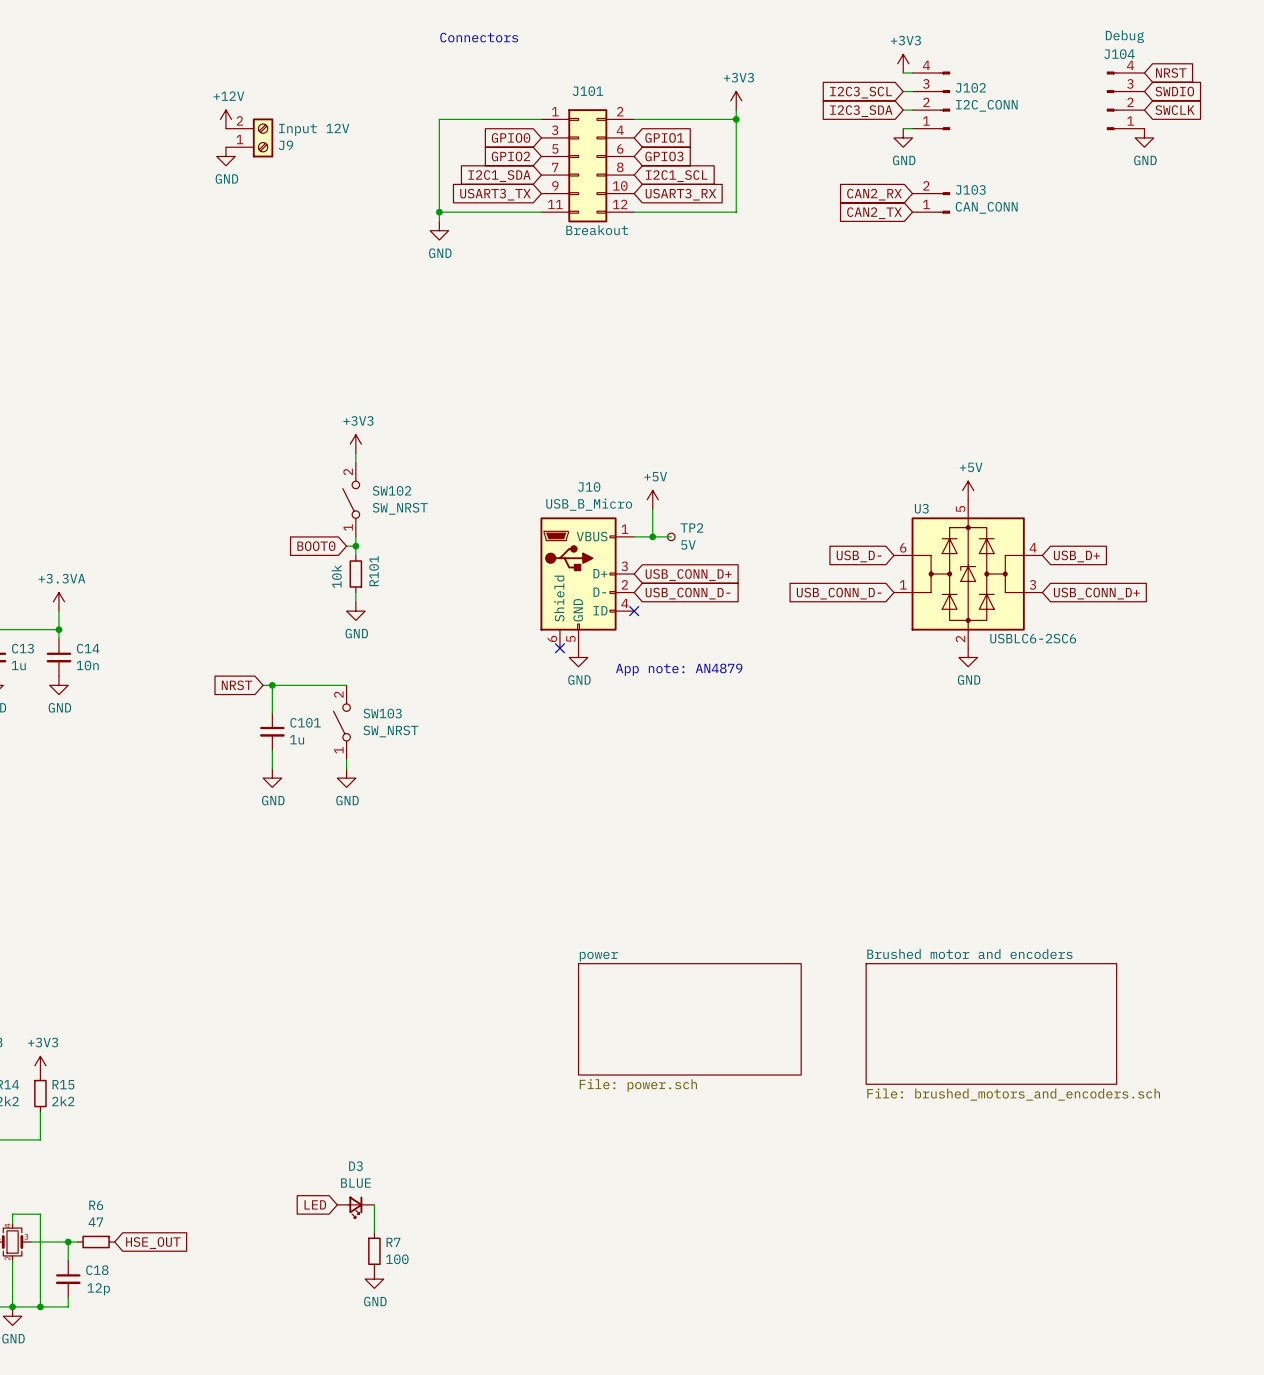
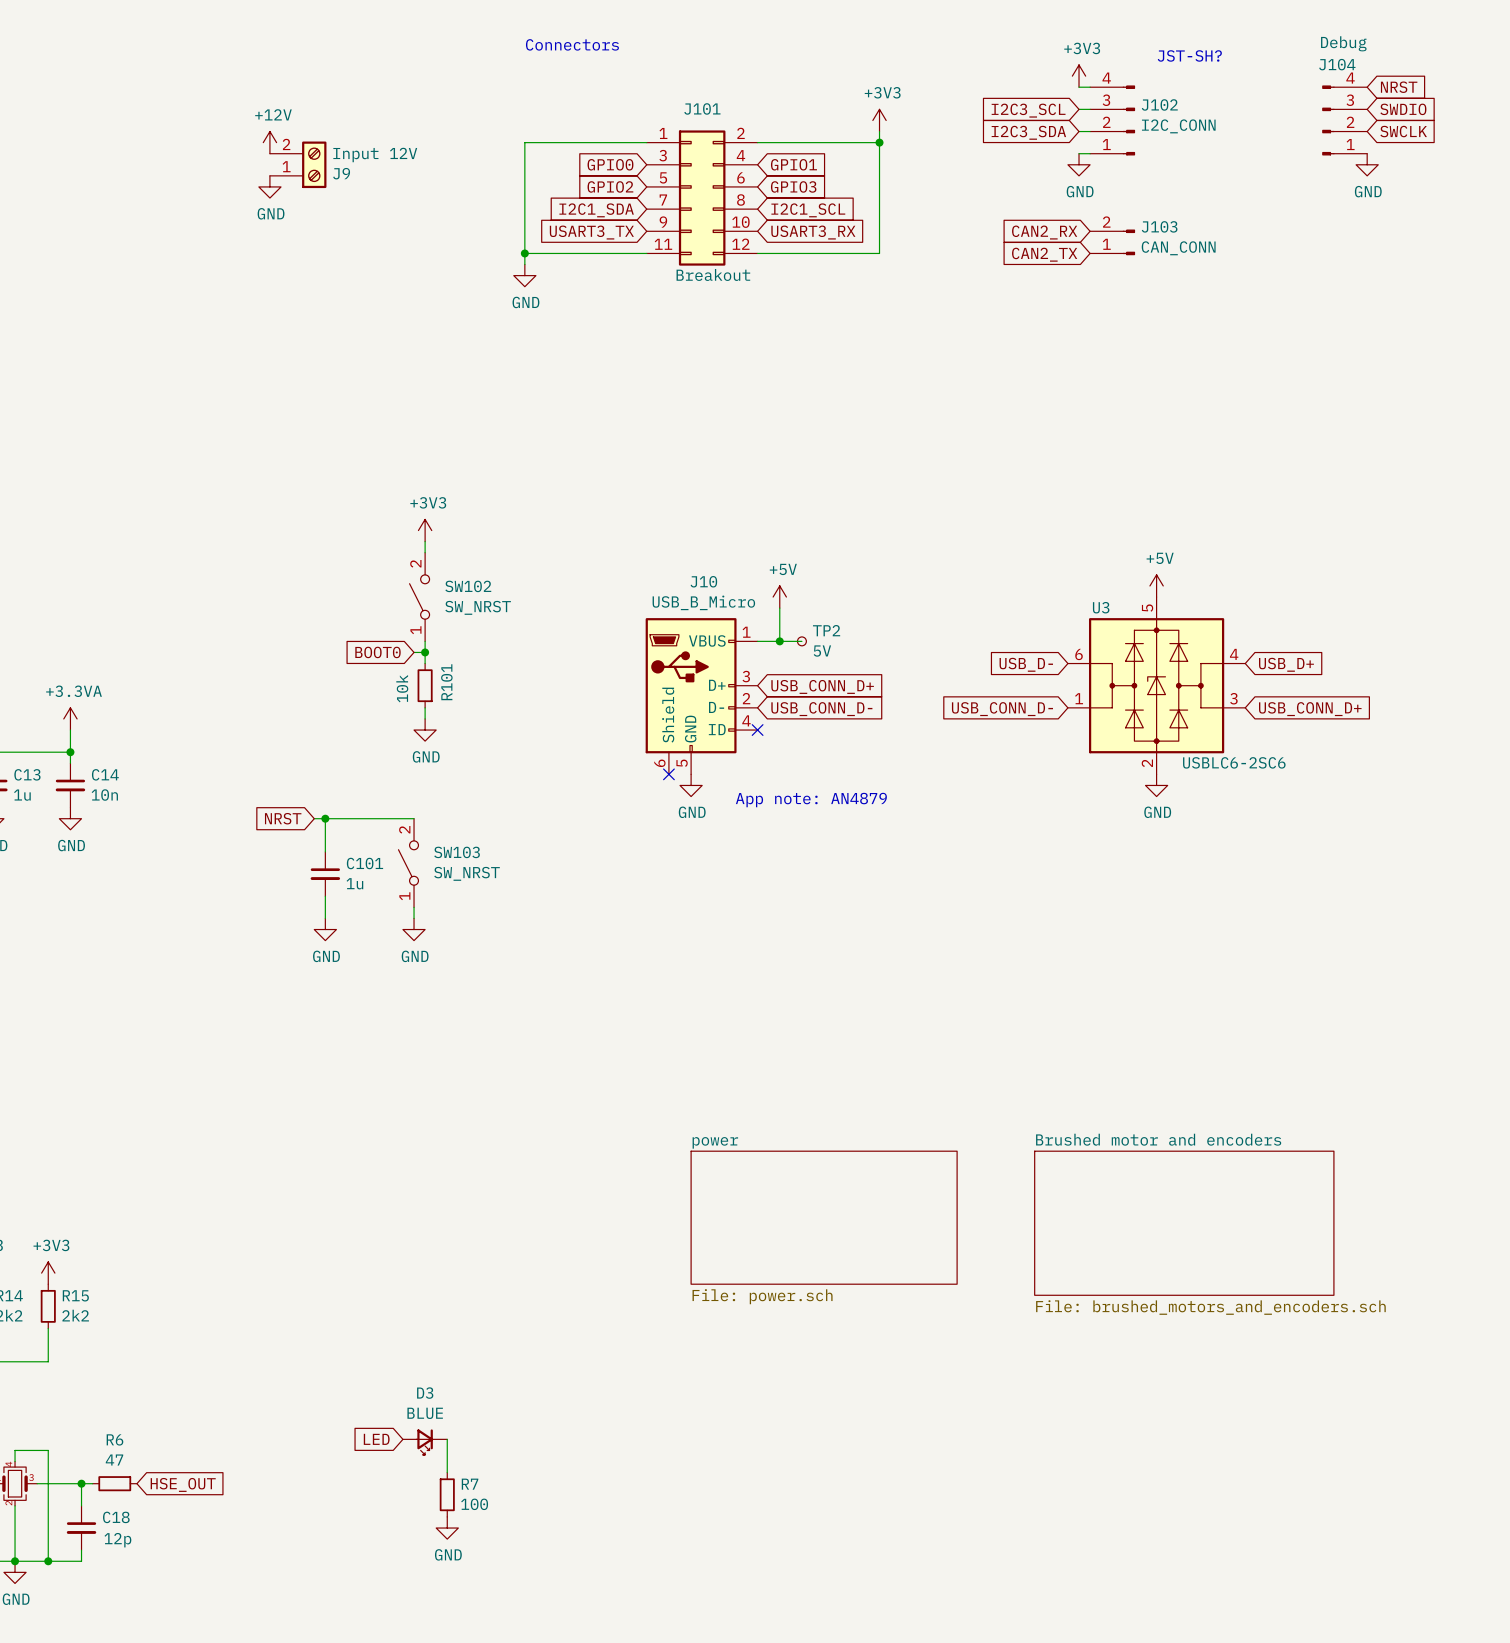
text: none -> JST-SH? (1189, 55)

